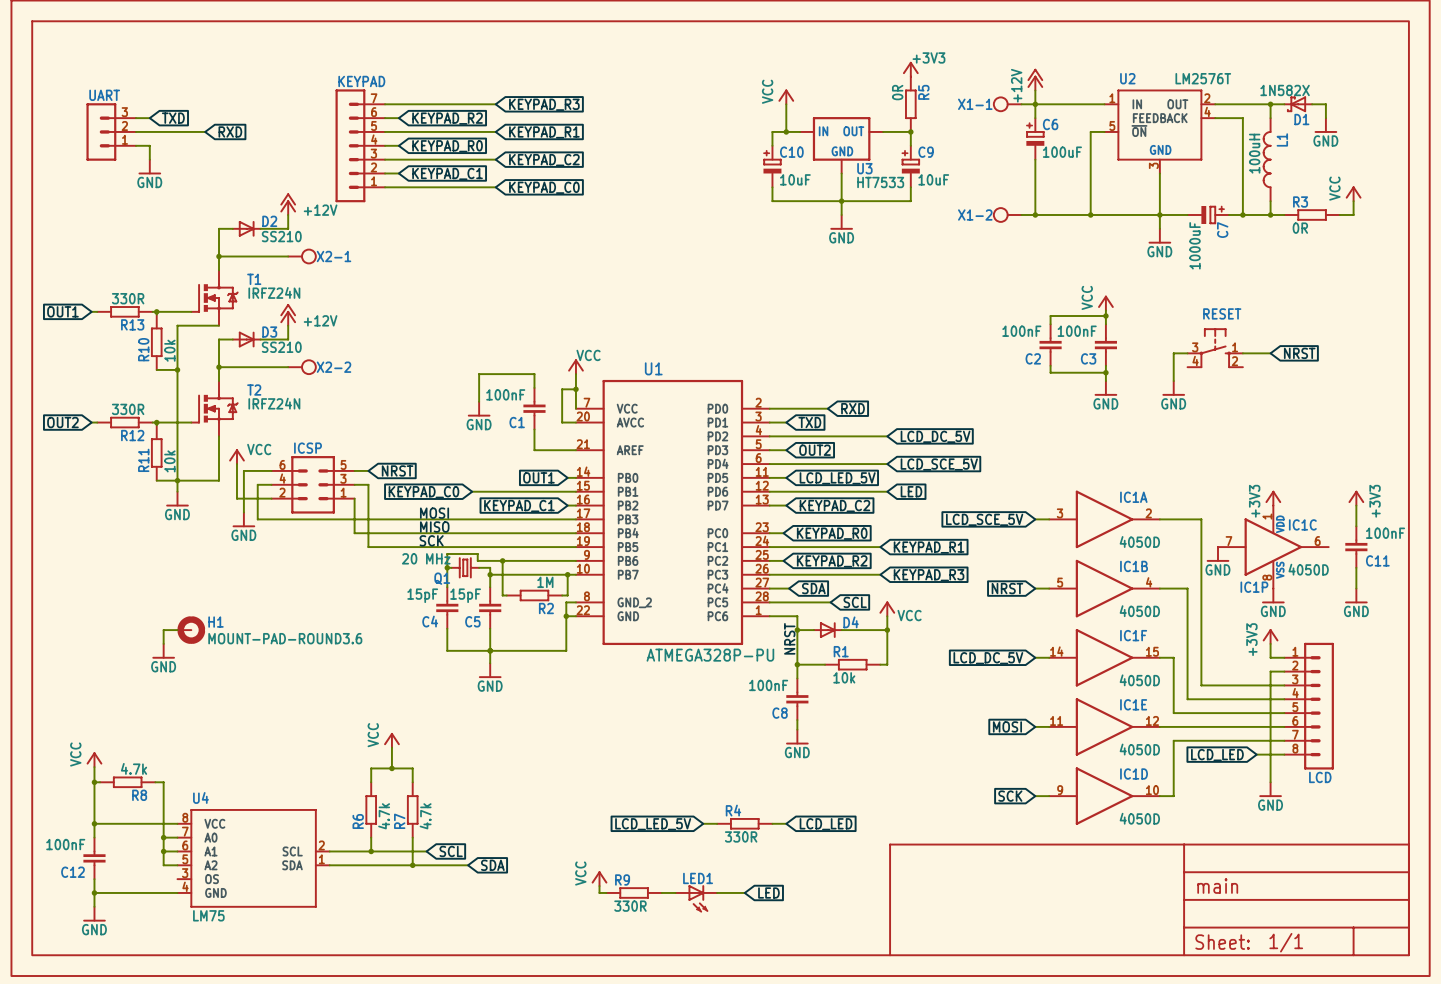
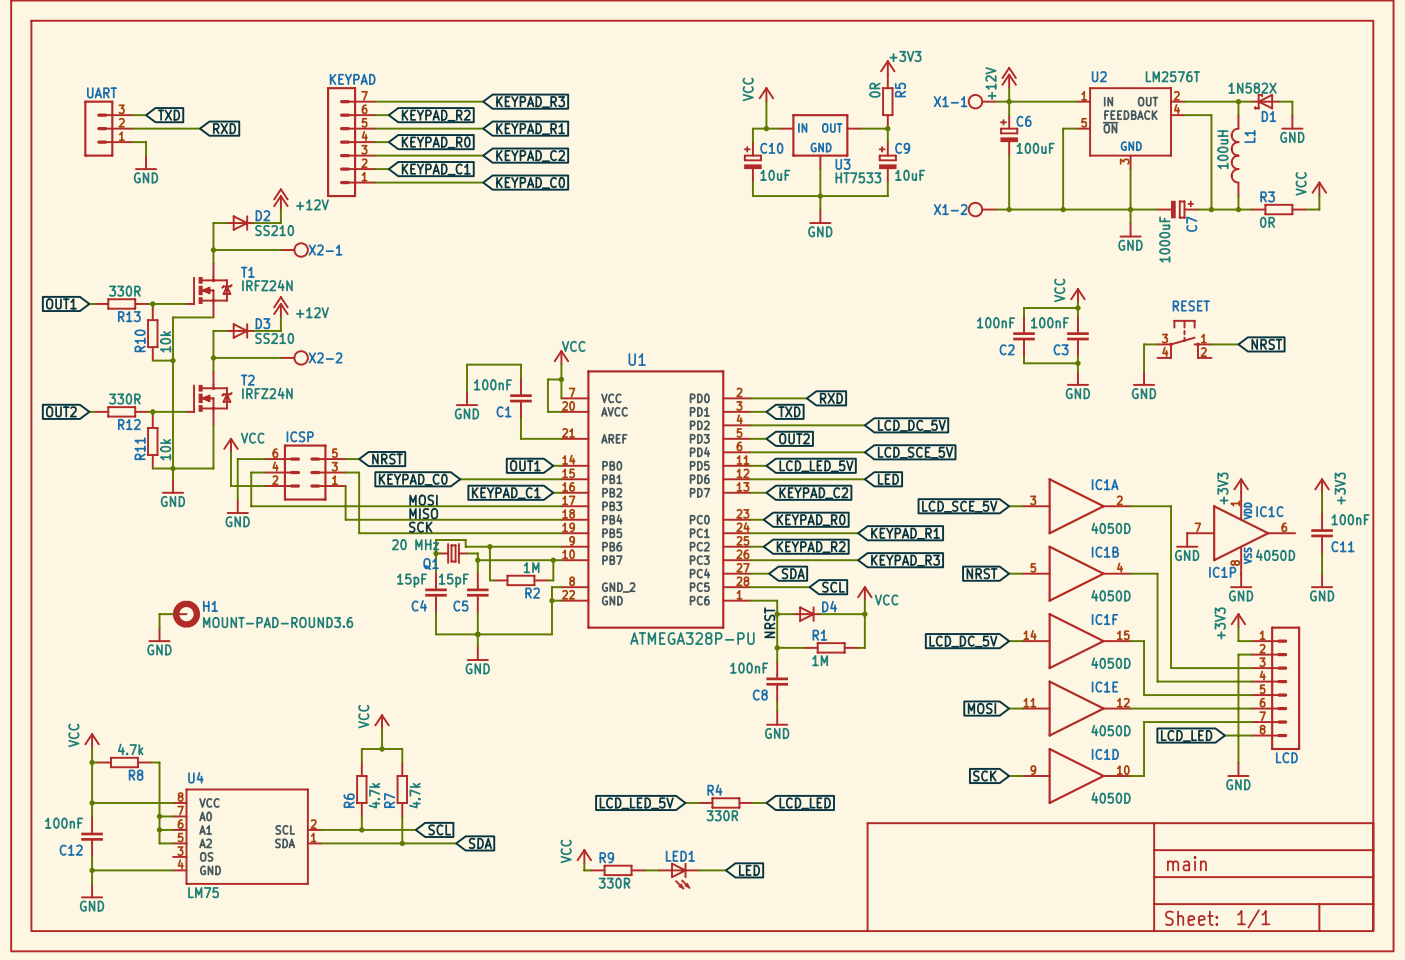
R1 value: 10k (844, 677) -> 1M (820, 660)

